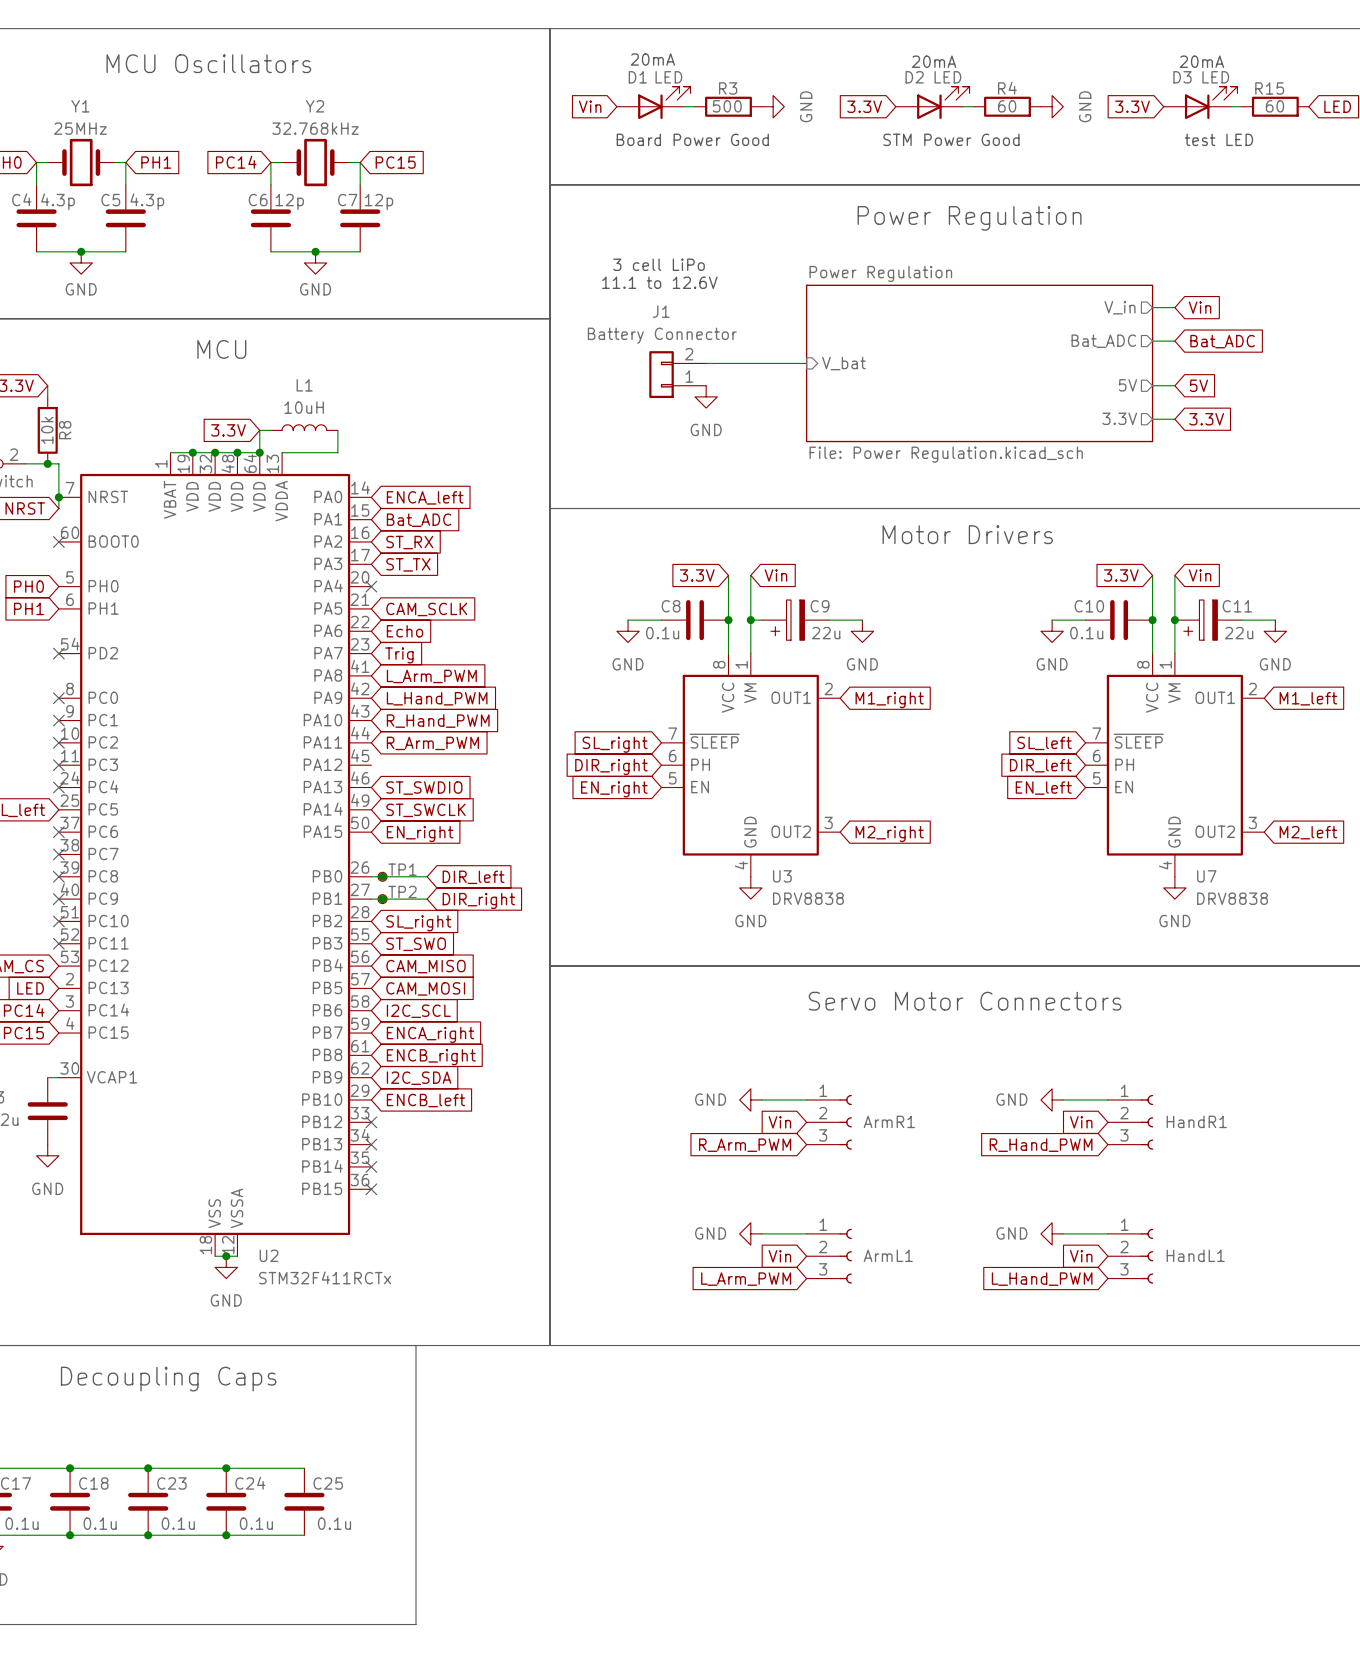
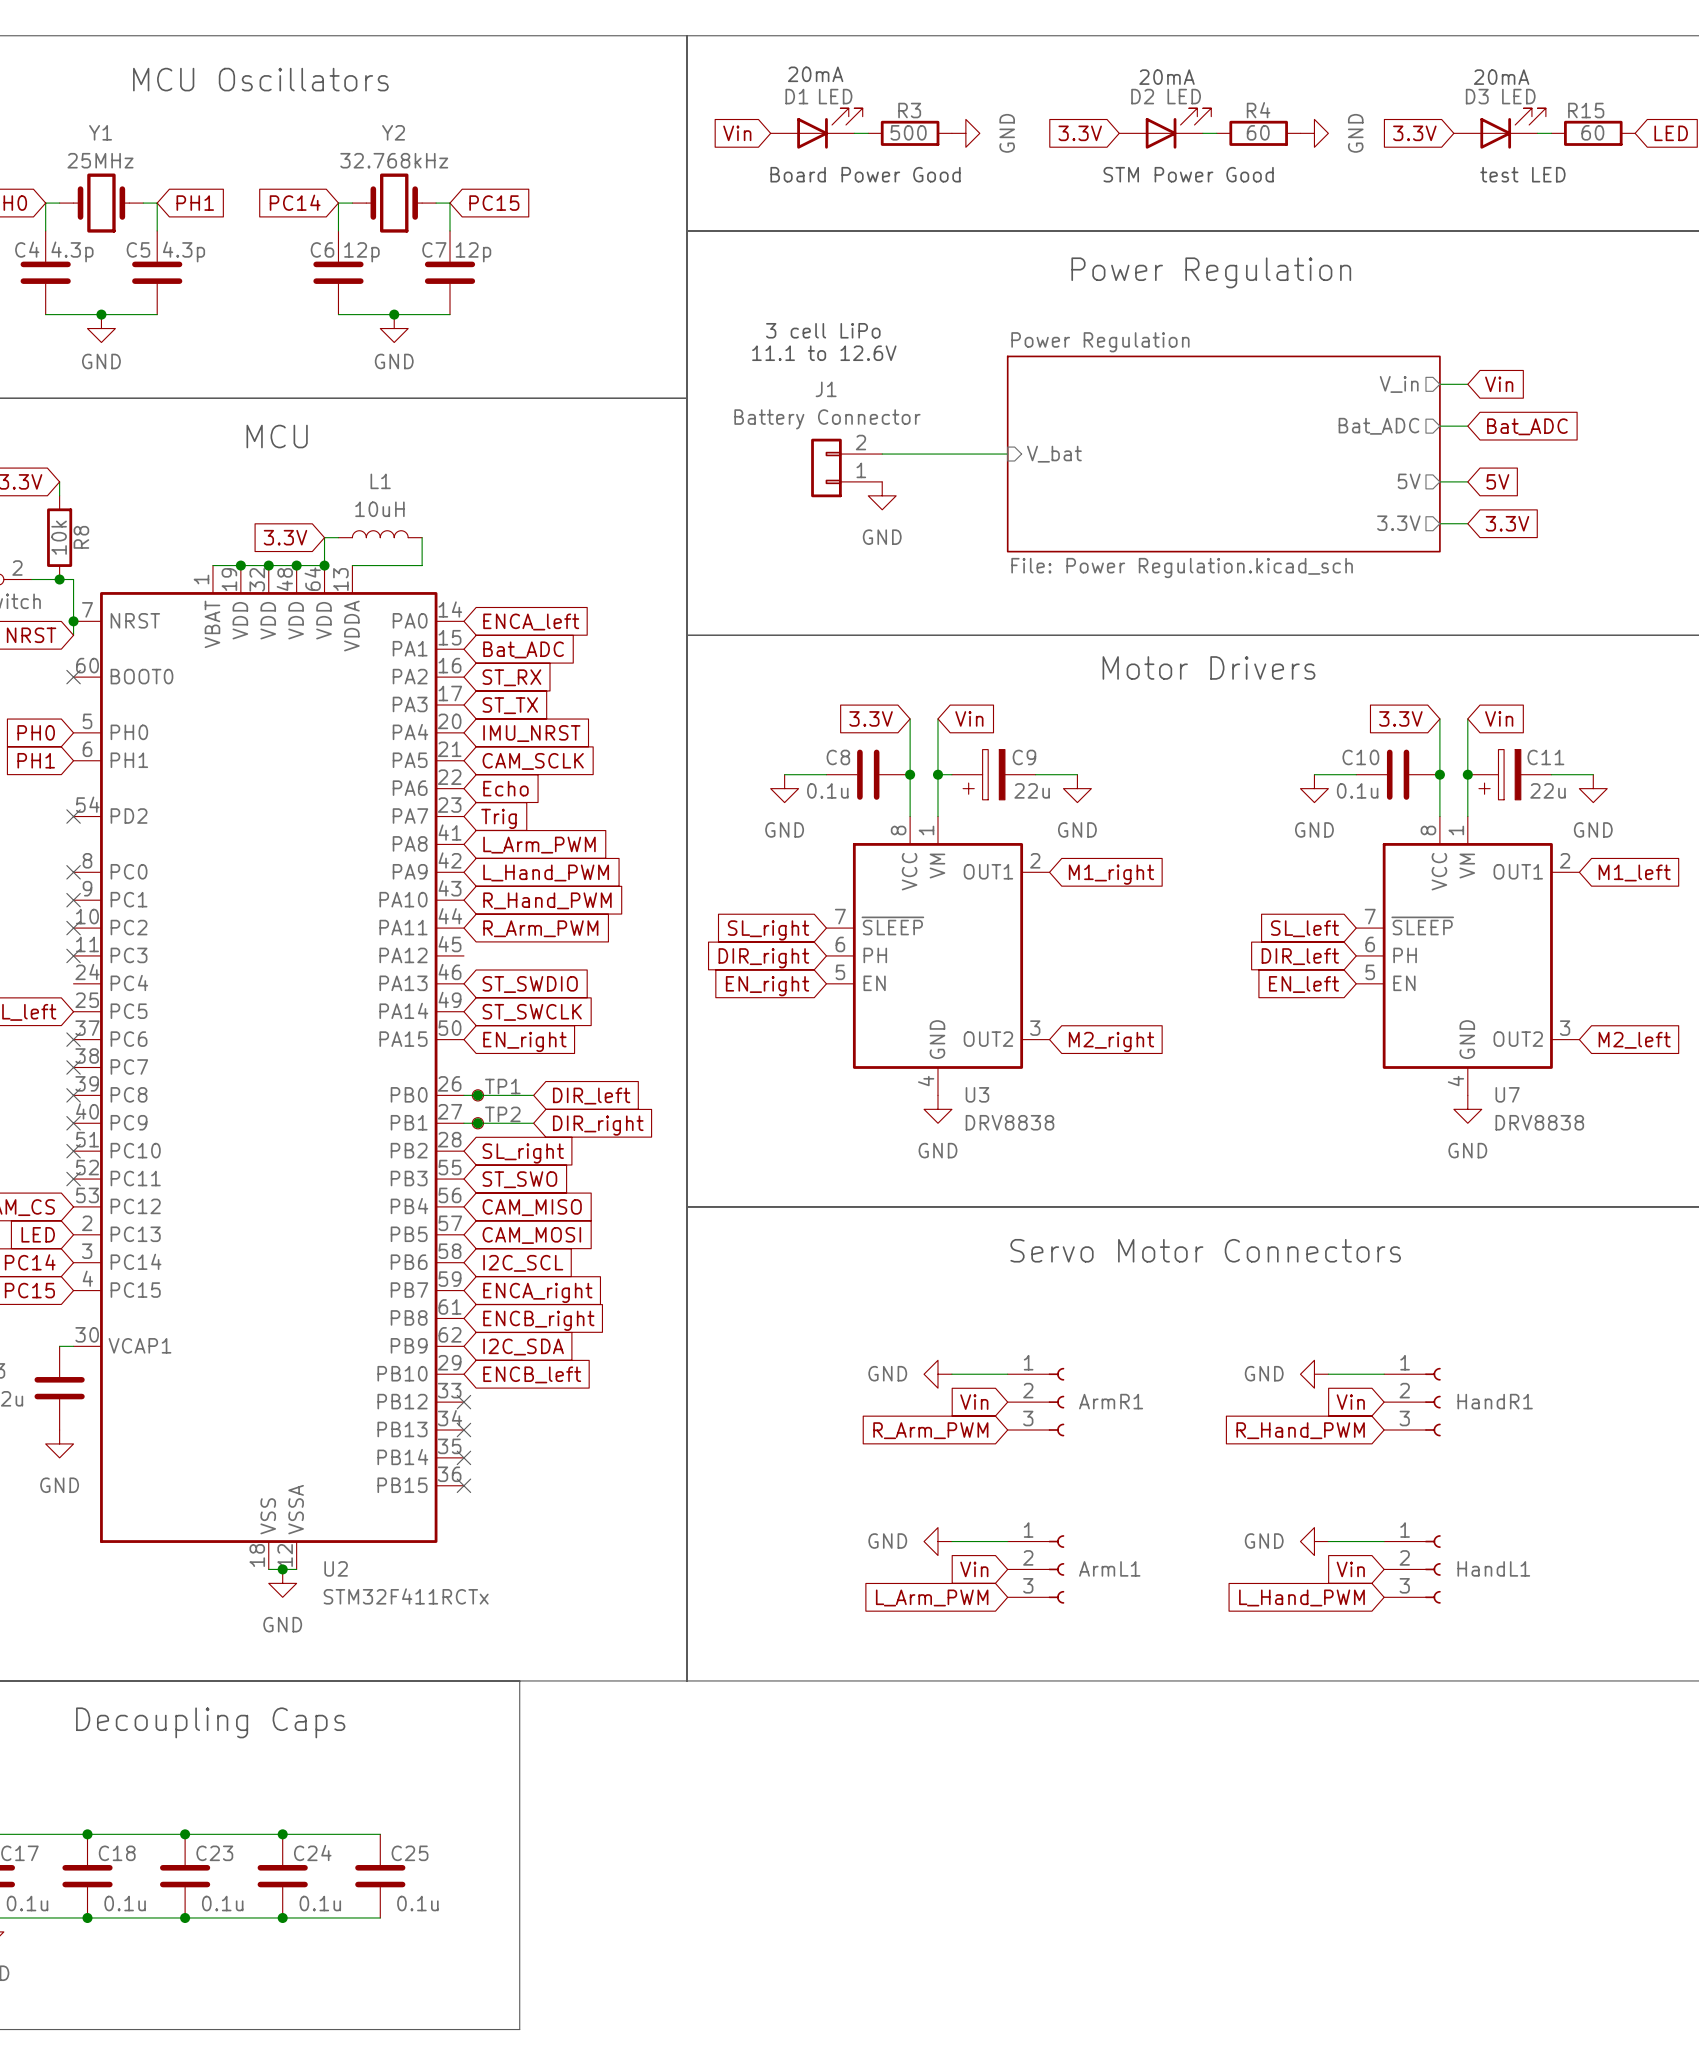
no-connect mark: (371, 586) -> none
global label: none -> IMU_NRST (531, 733)
no-connect mark: (58, 787) -> none

